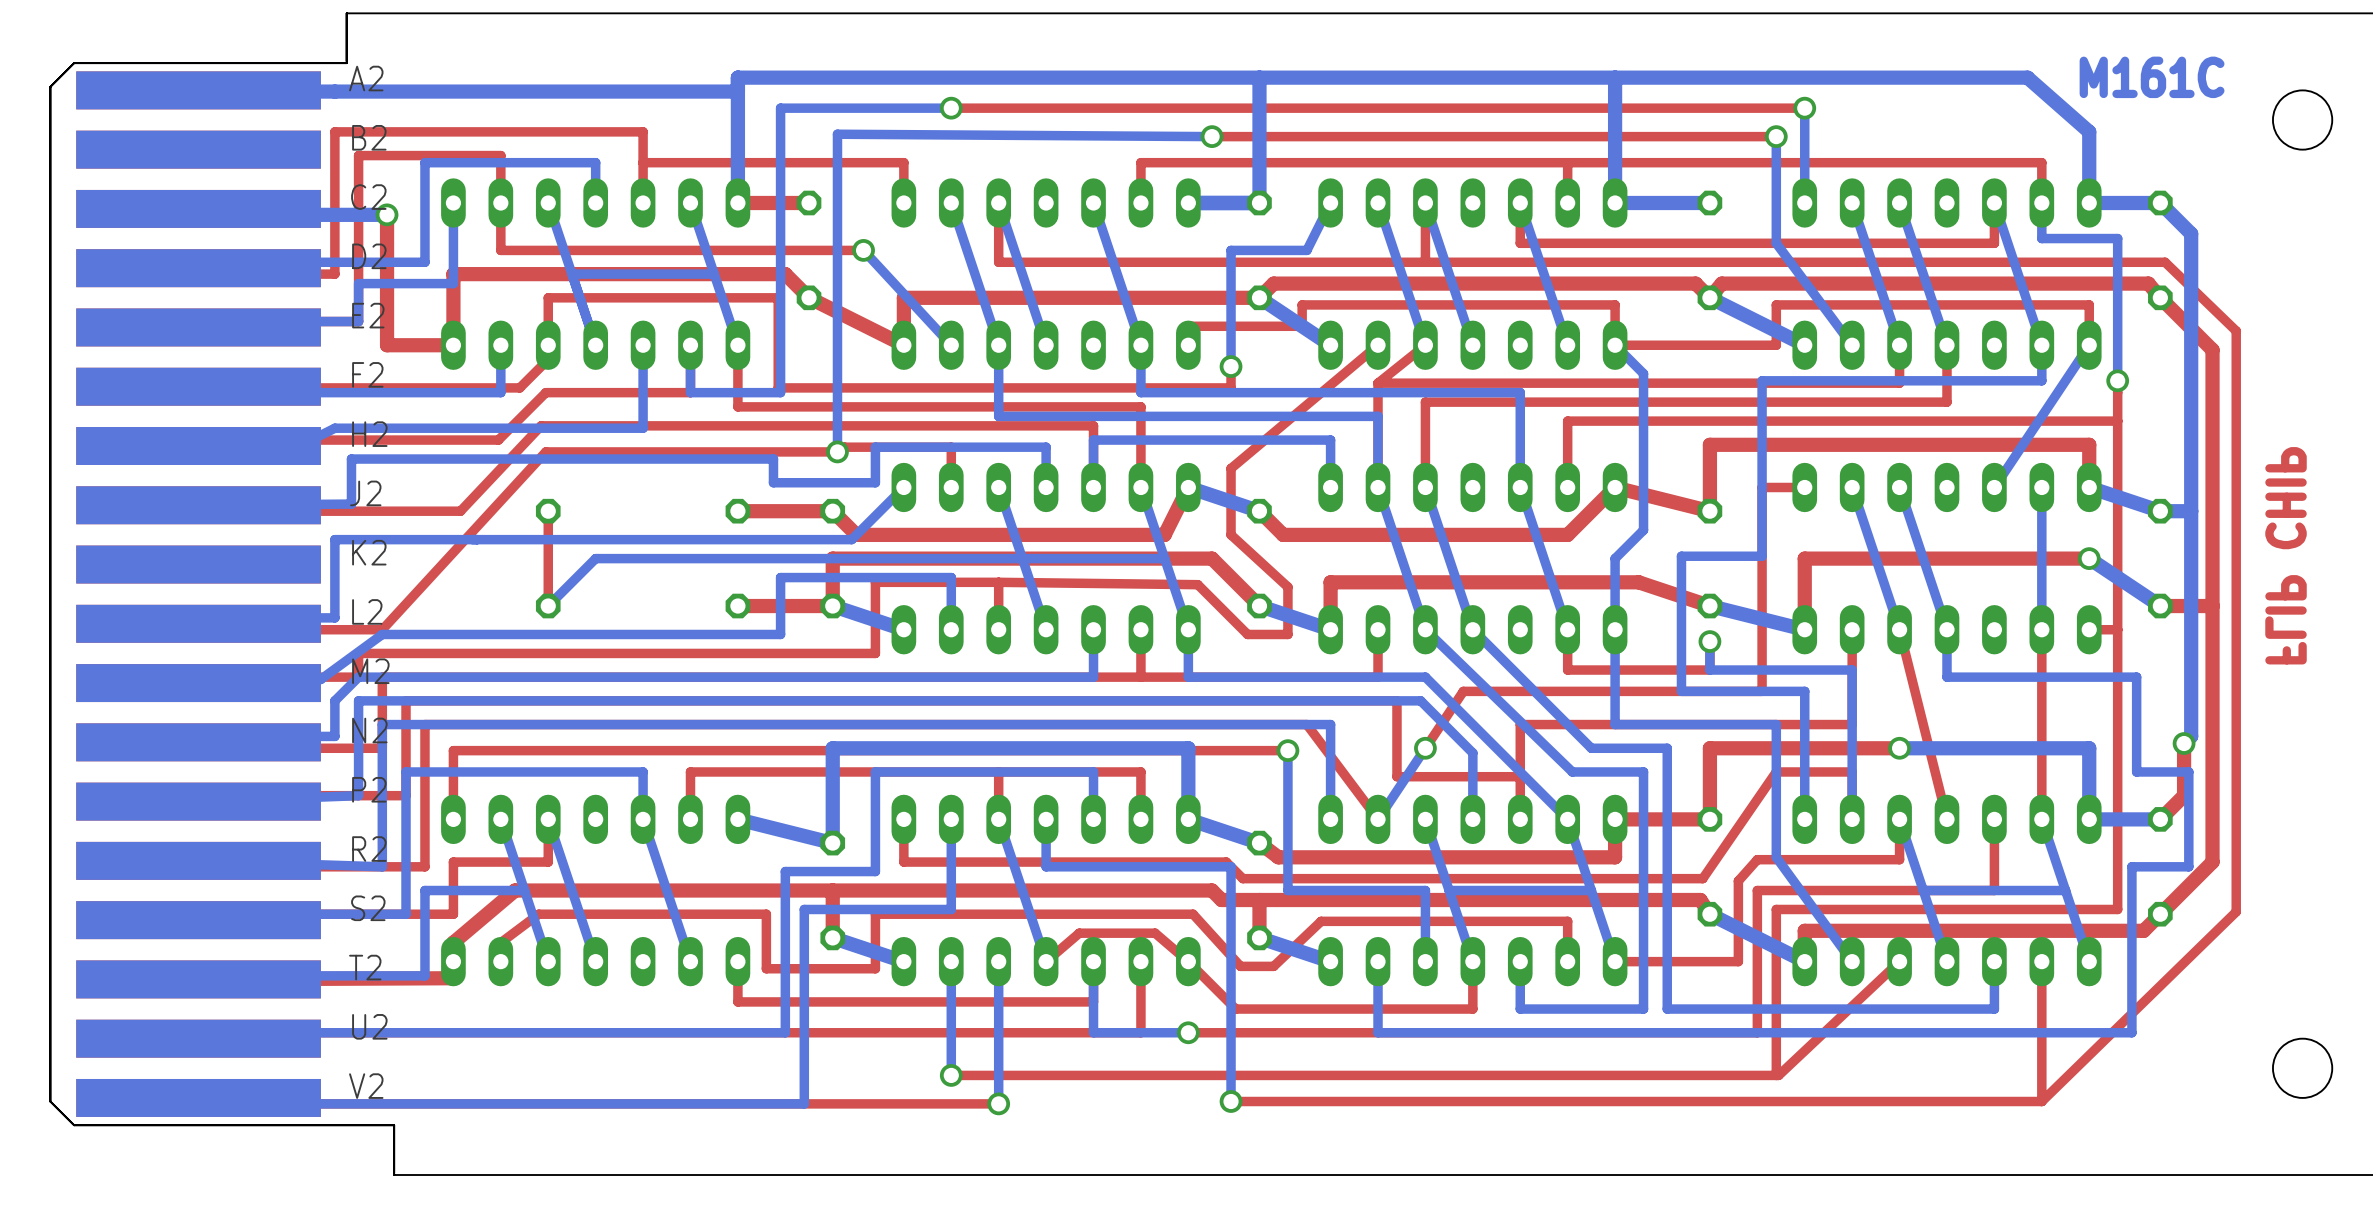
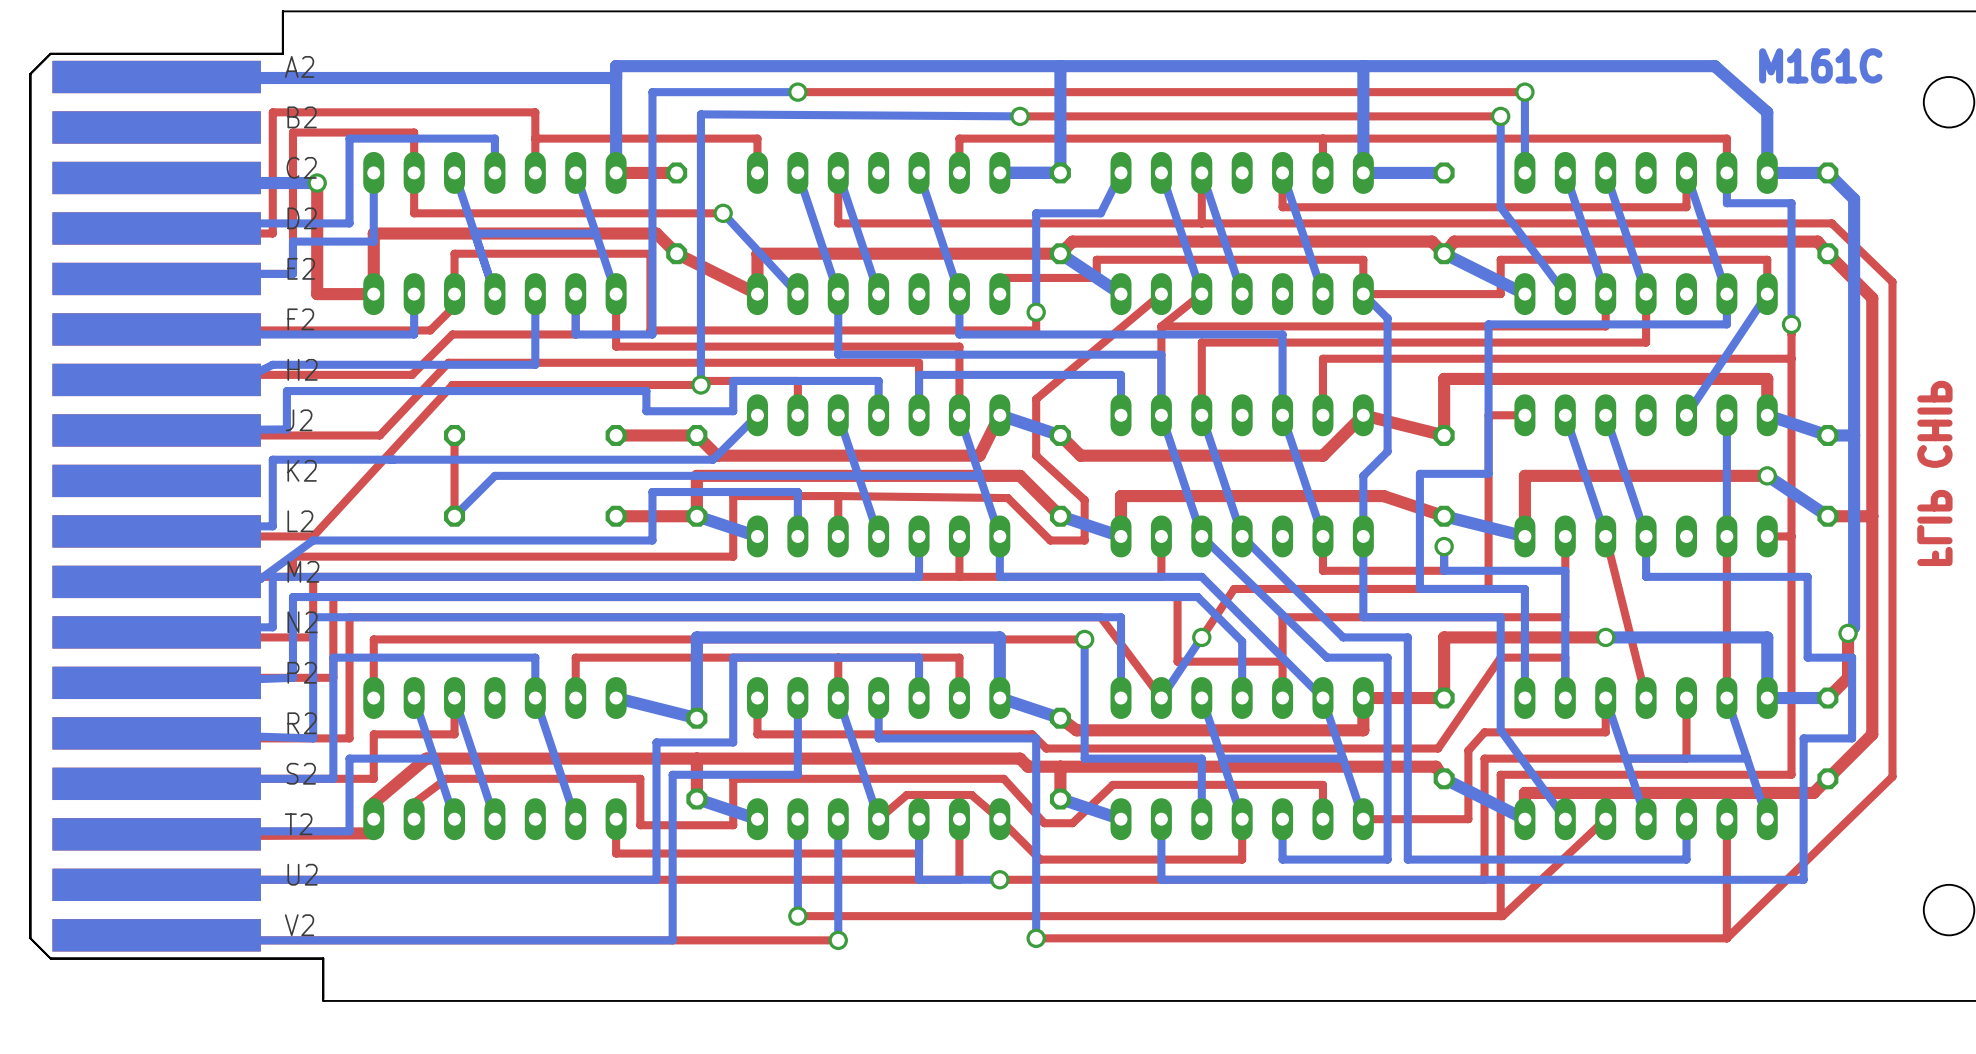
bottom track: (358, 677) (334, 700) -> (292, 576) (272, 576) (272, 597)

